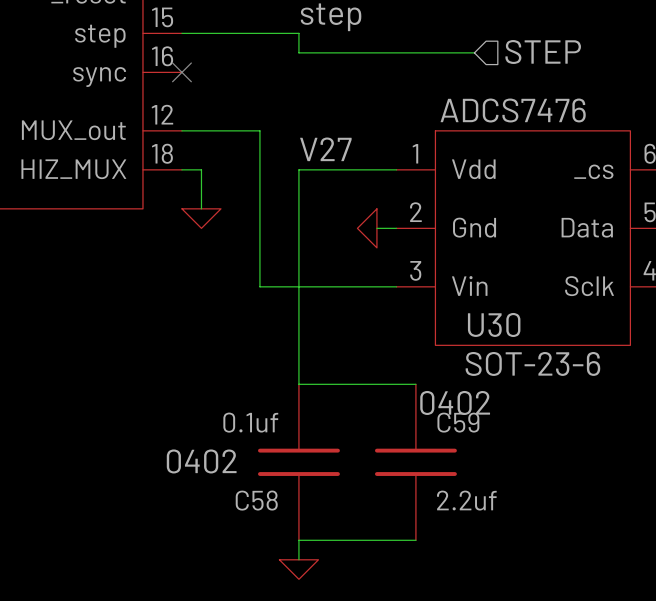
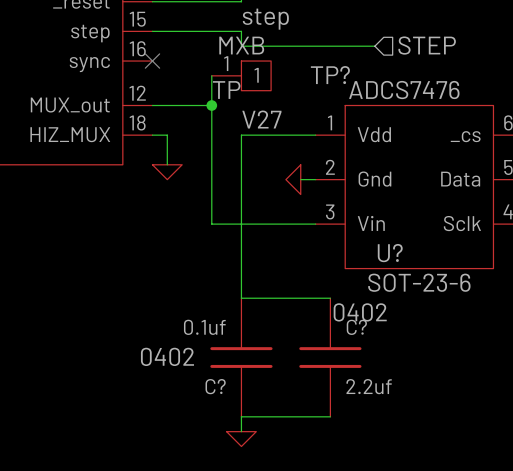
wire: none -> (211, 75) (211, 105)
TP?: none -> MXB (241, 75)
junction: none -> (211, 105)
U30 name: U30 (494, 324) -> U? (390, 253)
C59 name: C59 (458, 422) -> C? (356, 327)
C58 name: C58 (256, 500) -> C? (215, 386)

